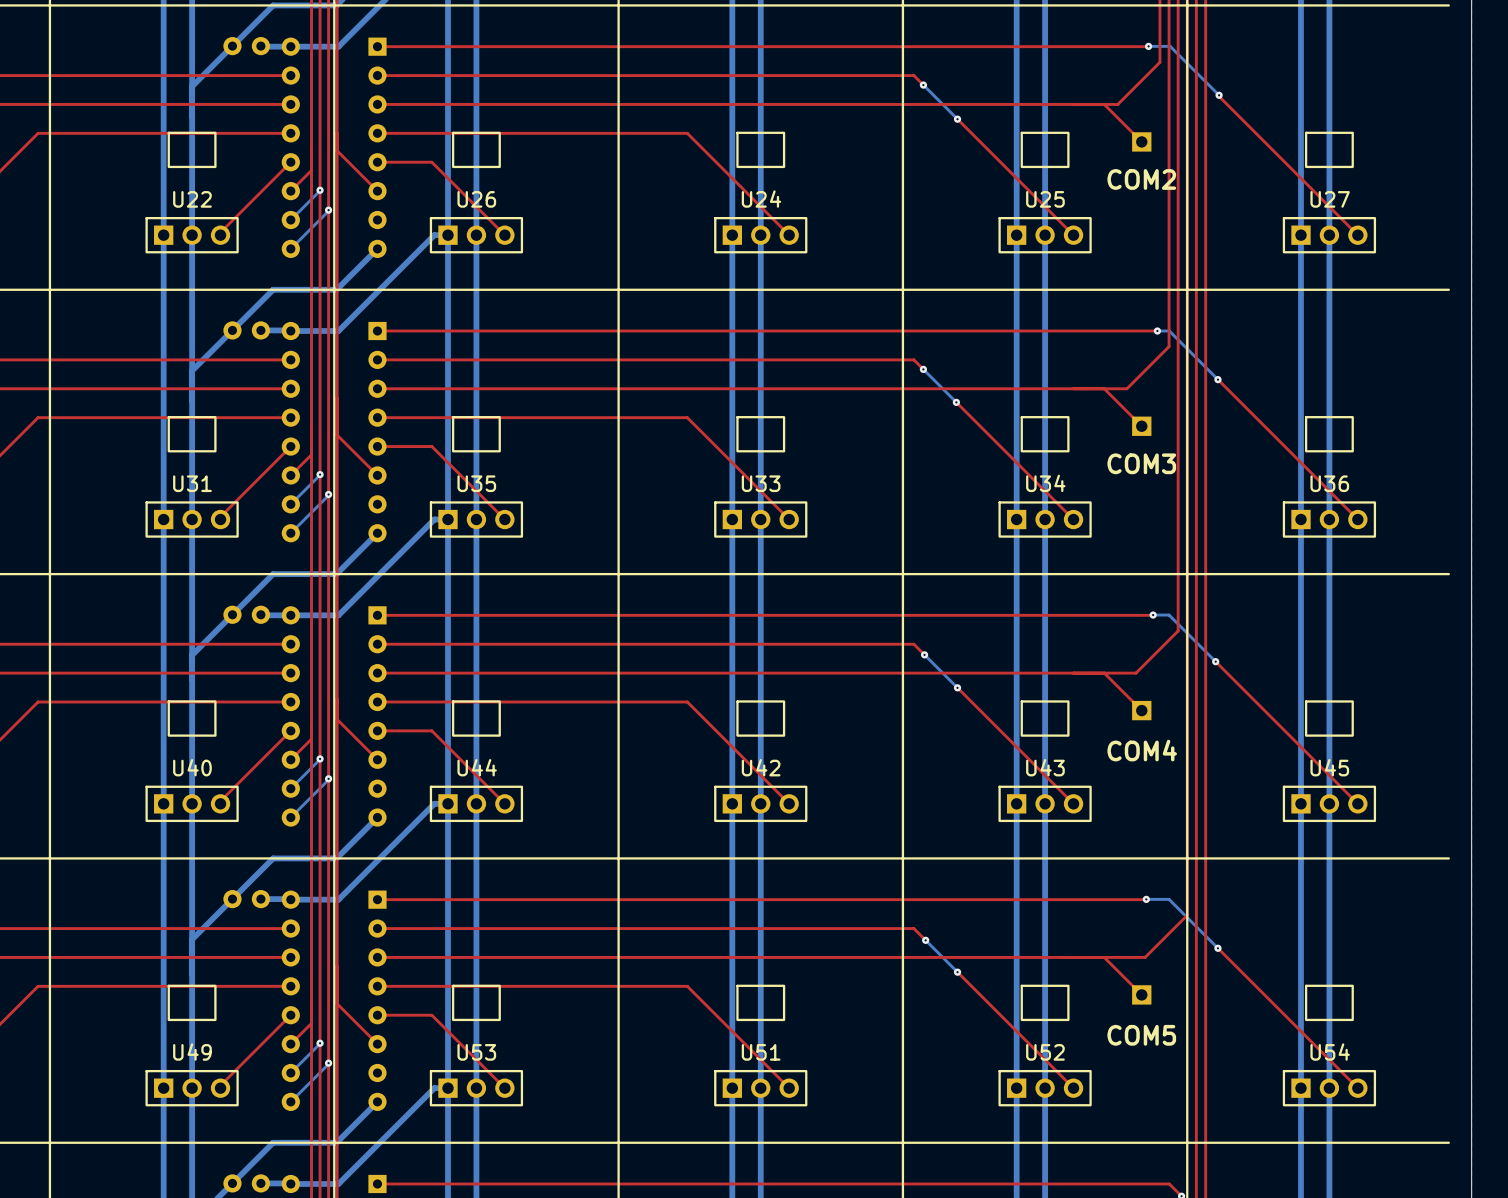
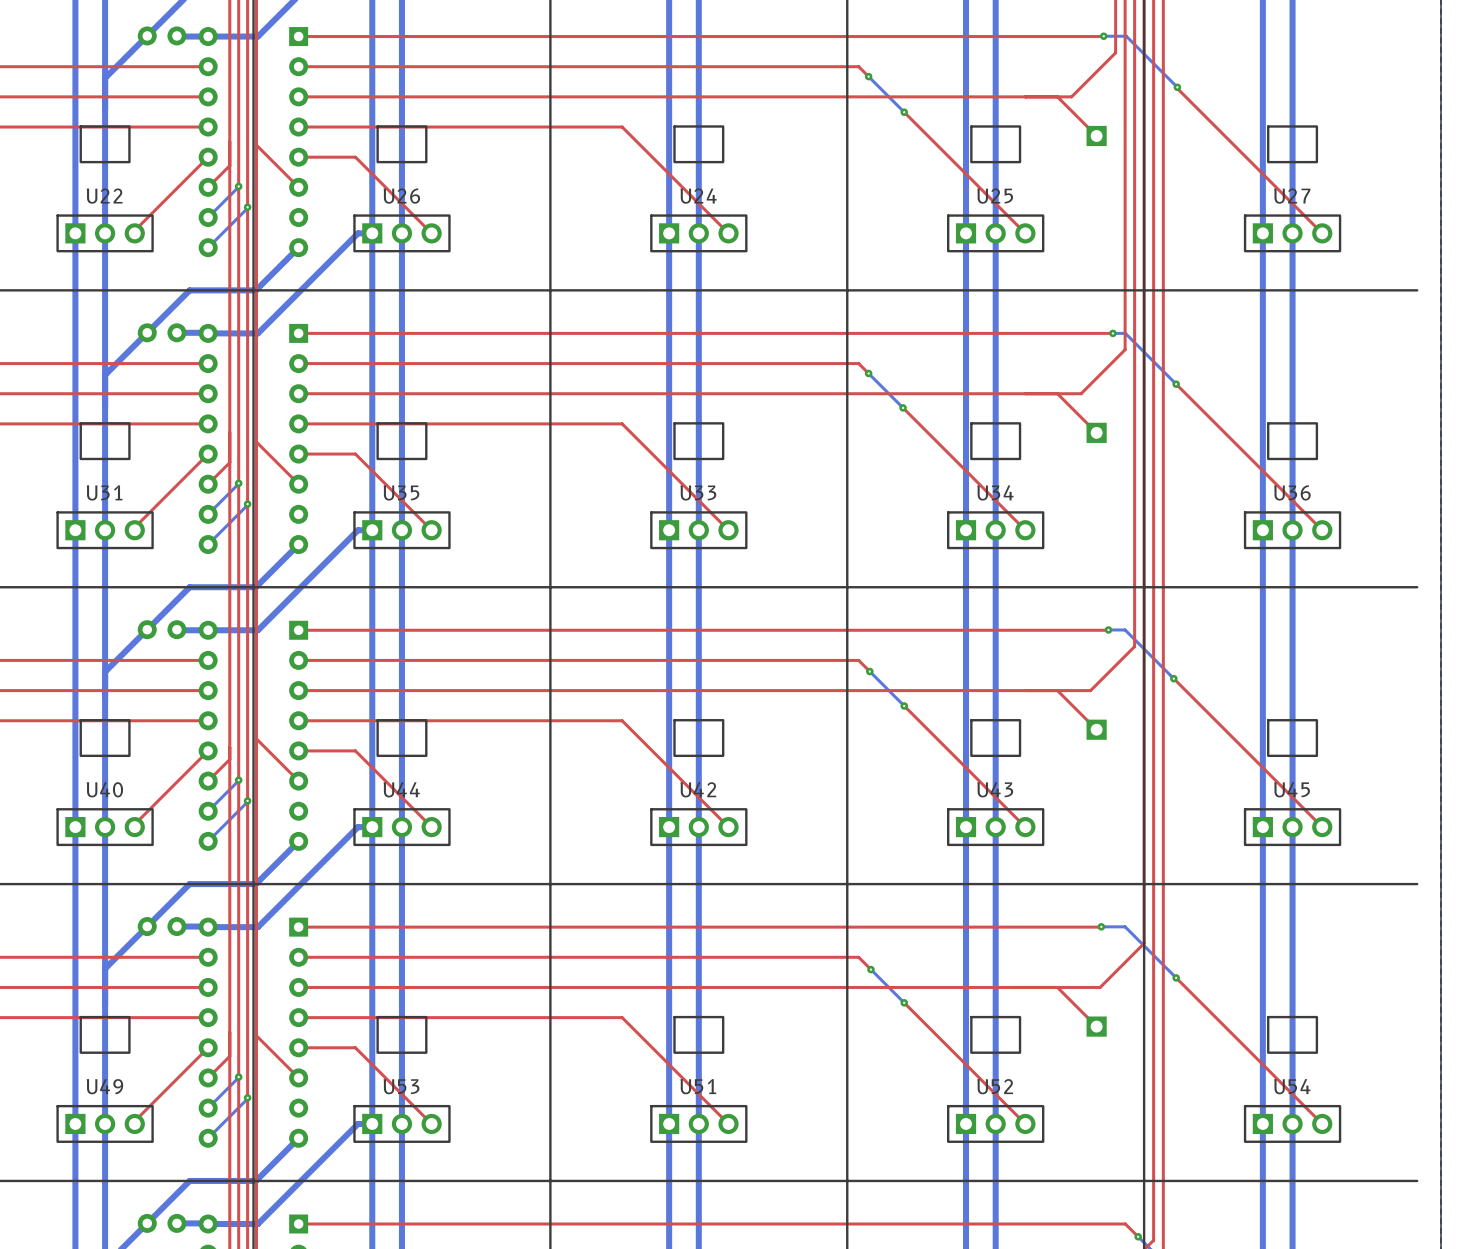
text: COM2 (1141, 179) -> none
text: COM3 (1141, 463) -> none
text: COM4 (1142, 750) -> none
text: COM5 (1141, 1035) -> none

